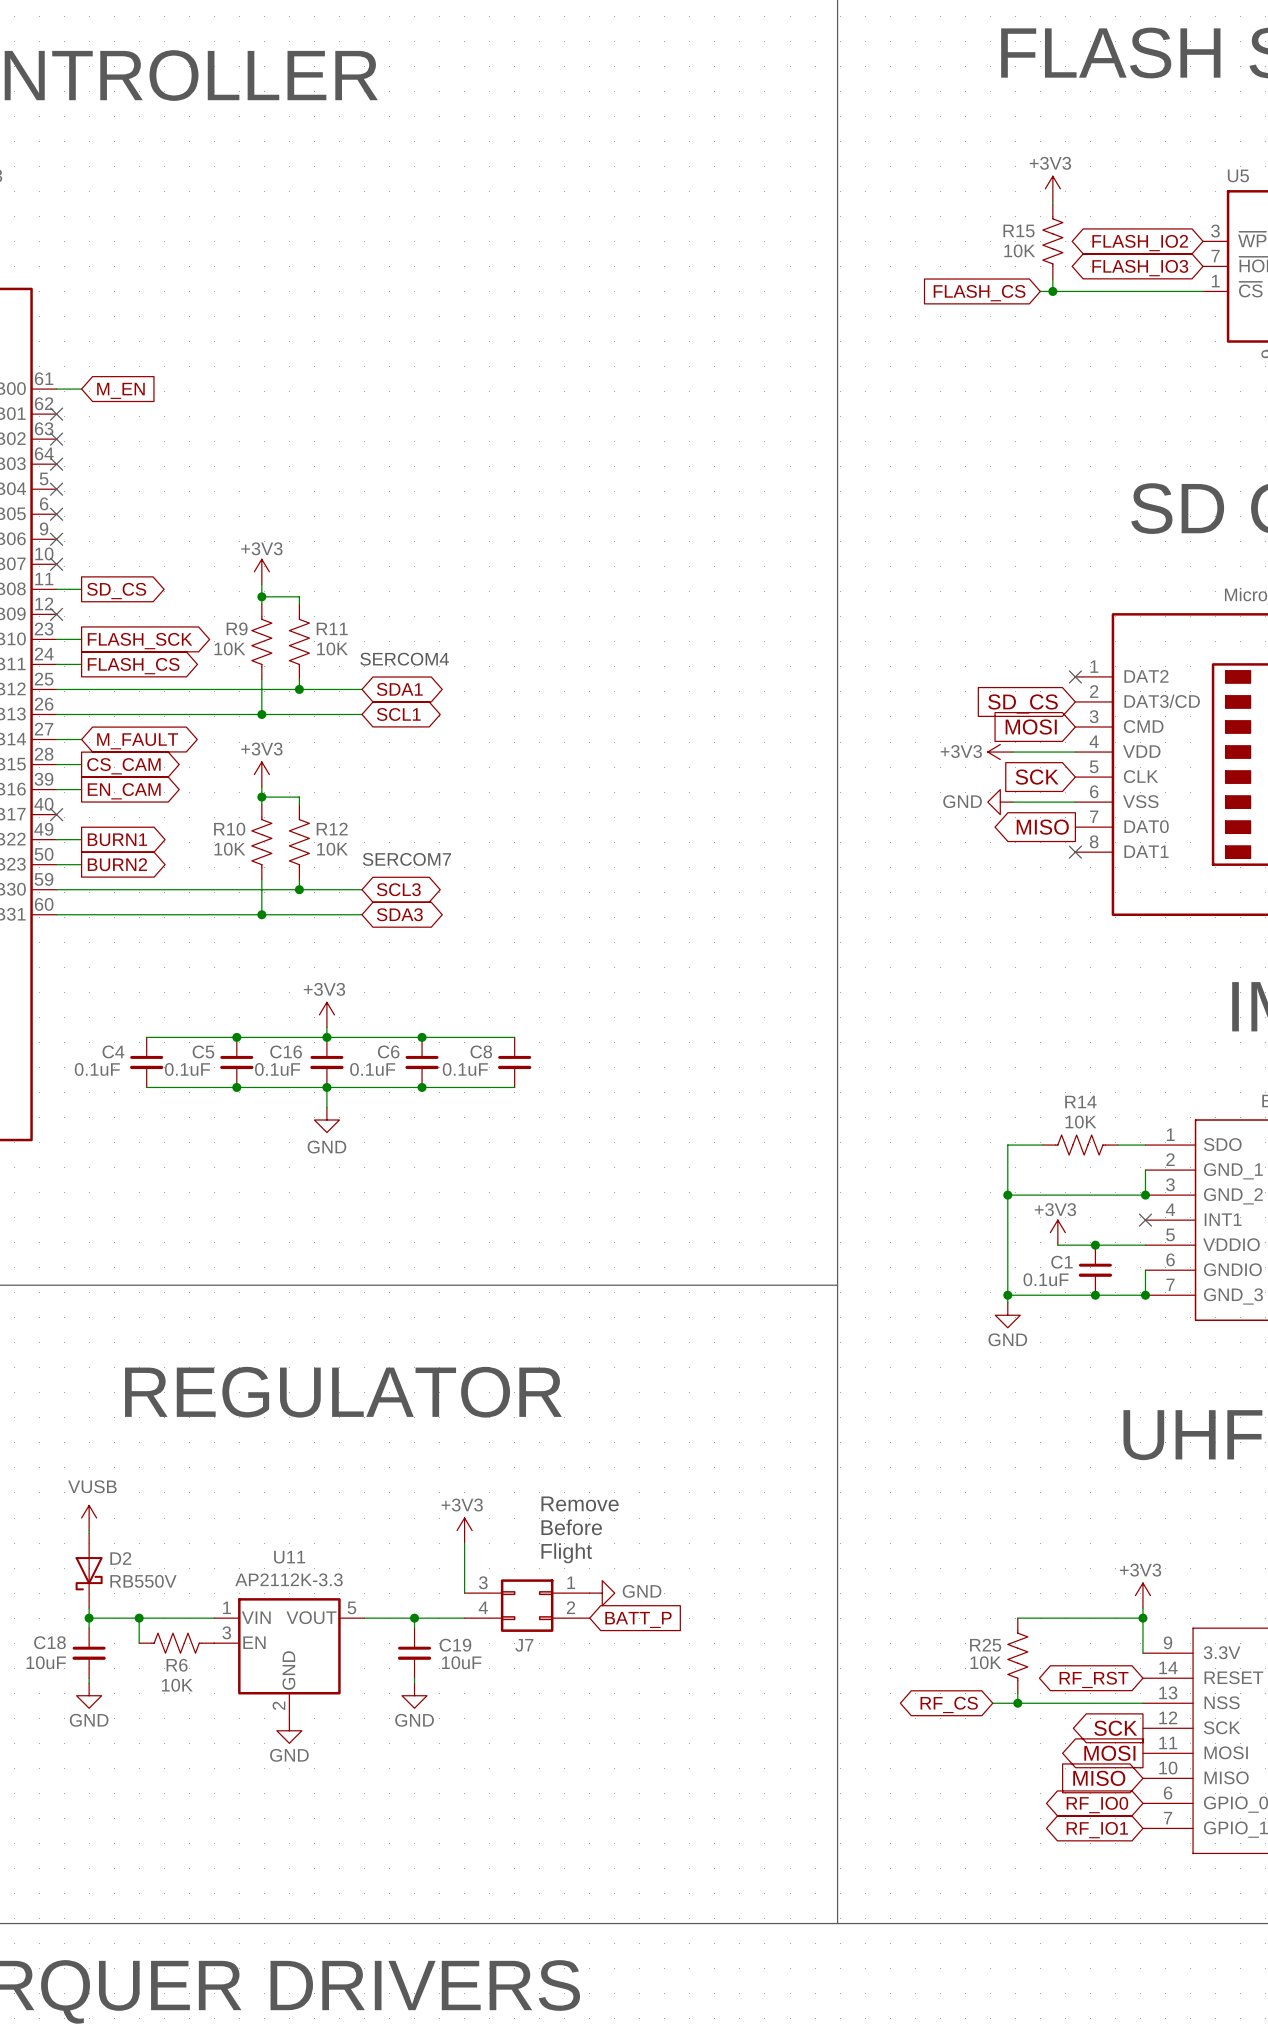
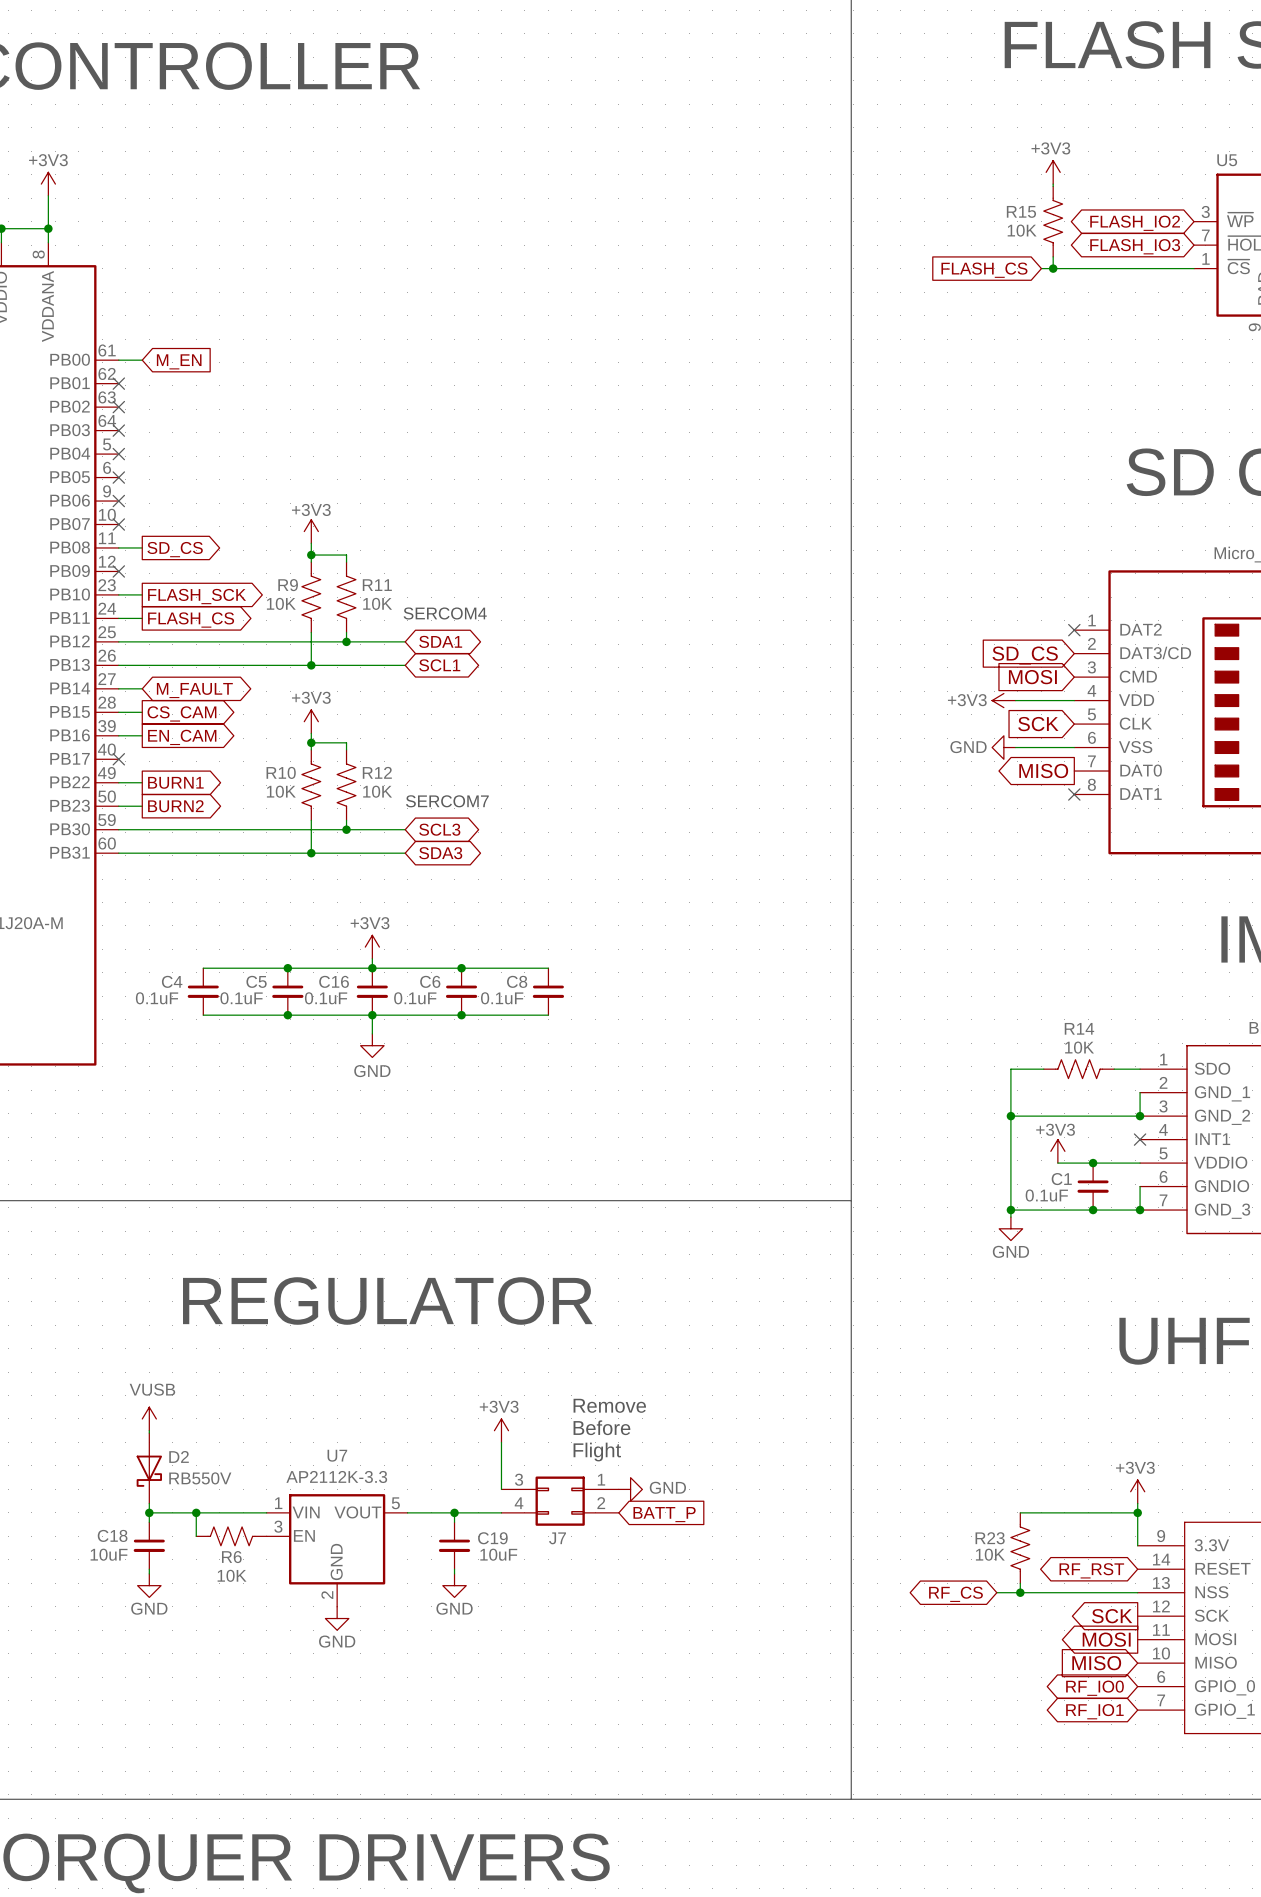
U11 name: U11 (289, 1557) -> U7 (337, 1455)
R25 name: R25 (985, 1645) -> R23 (990, 1538)

